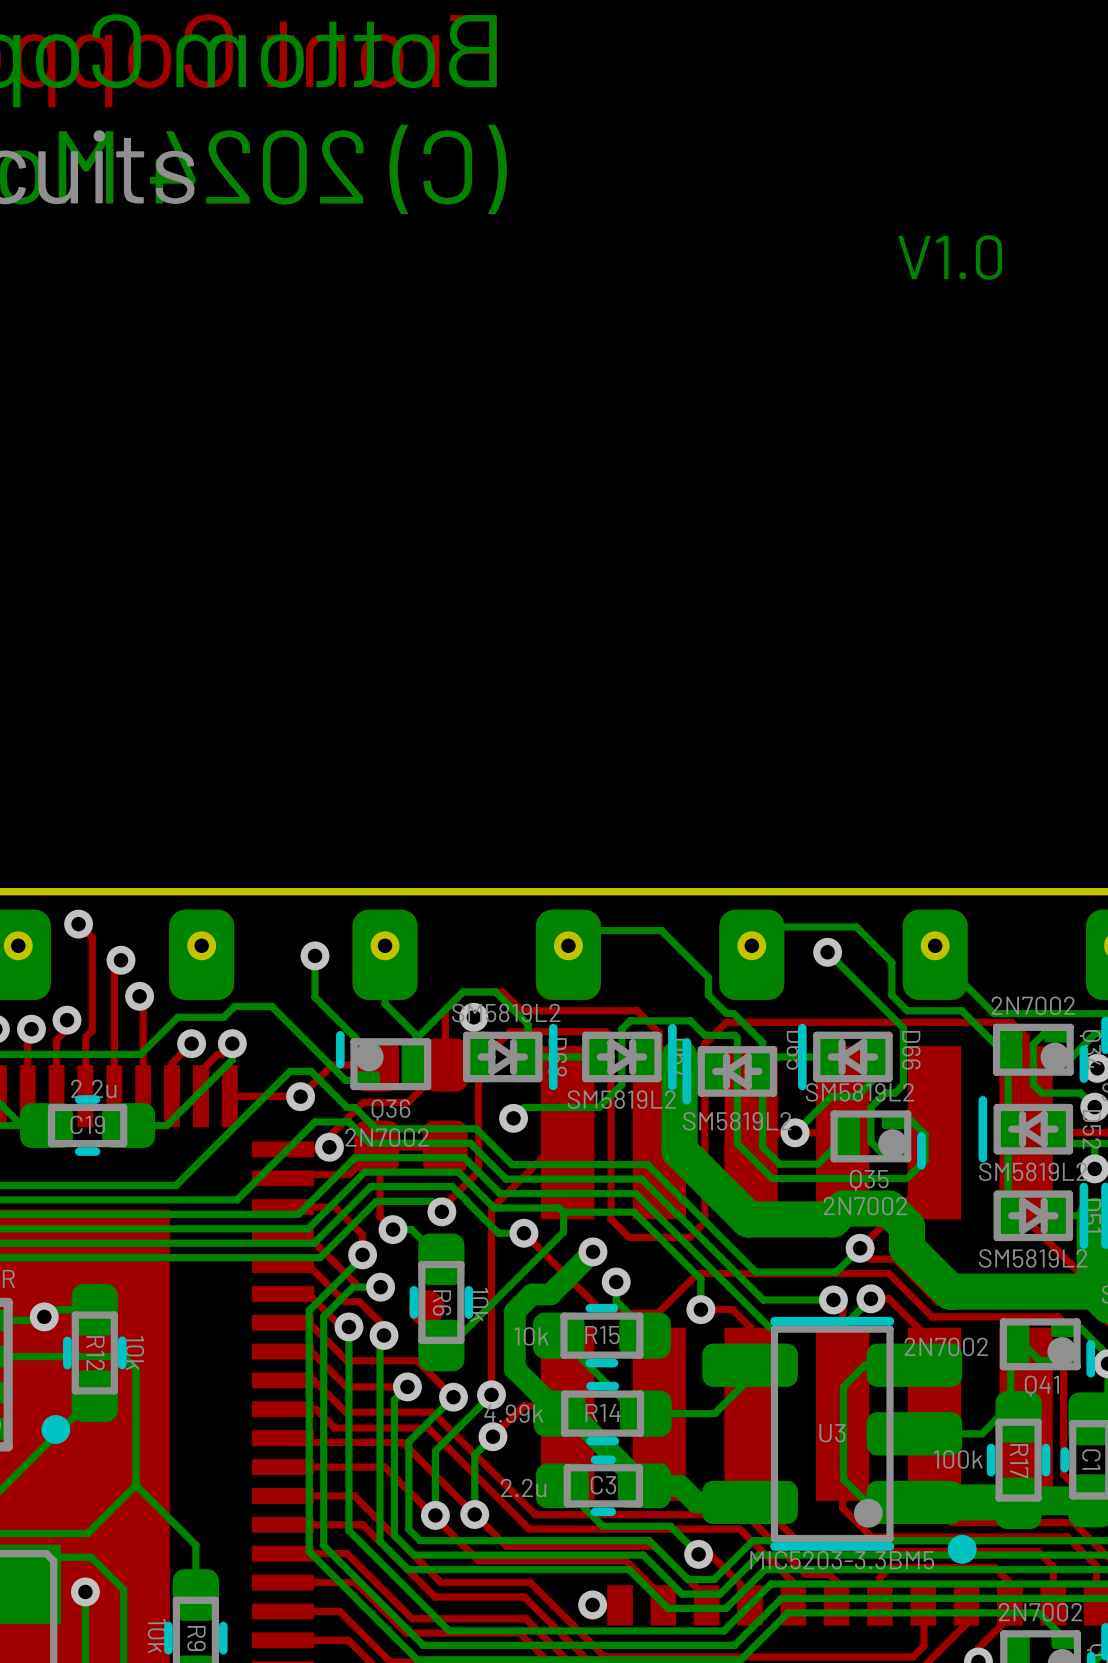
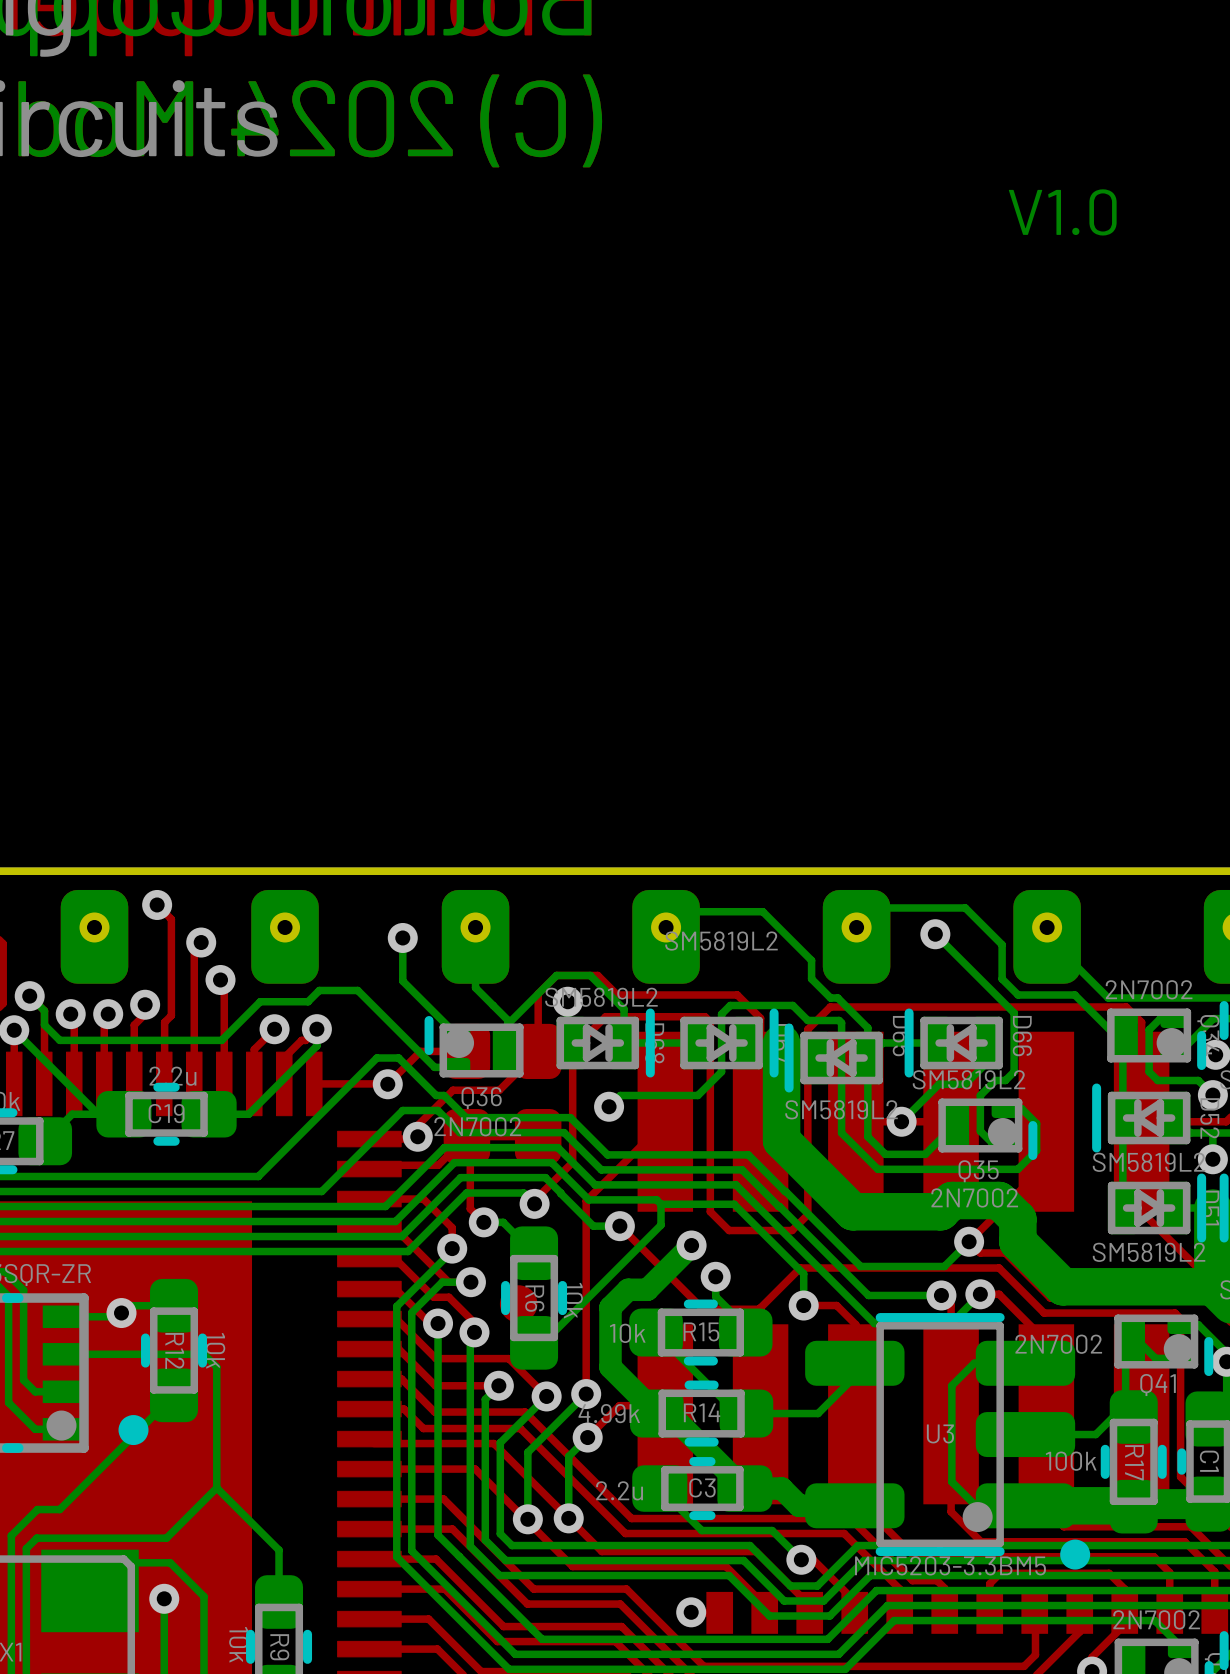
part value position: SM5819L2 (621, 1099) -> SM5819L2 (721, 941)

